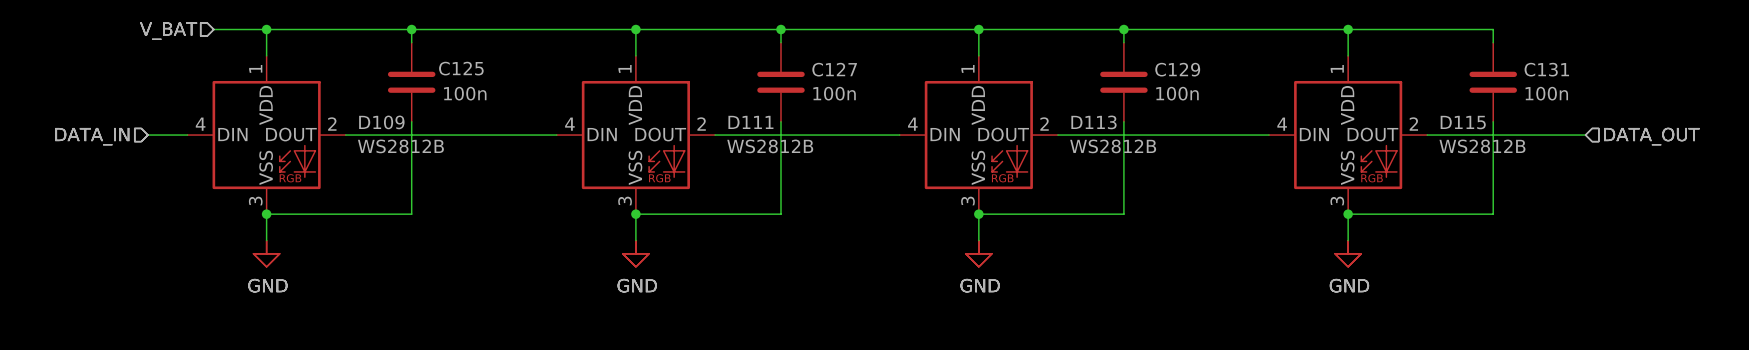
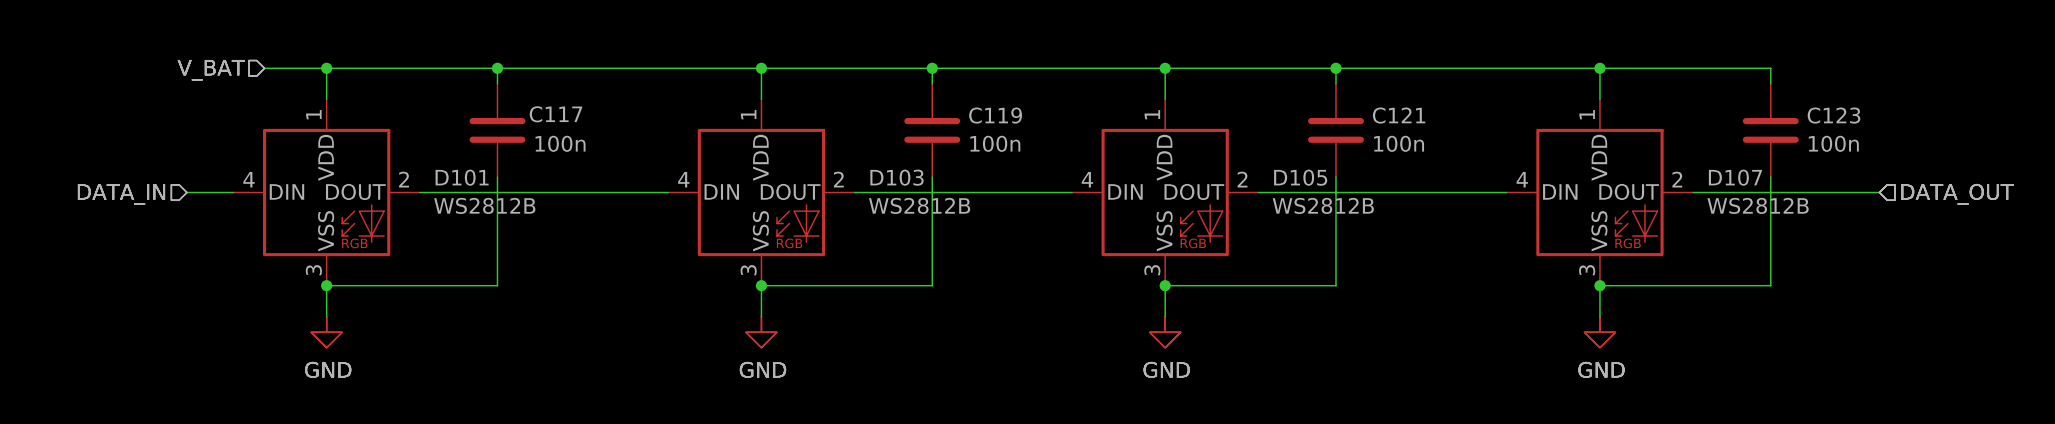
C125 name: C125 (461, 68) -> C117 (555, 114)
C127 name: C127 (834, 69) -> C119 (995, 115)
C129 name: C129 (1177, 69) -> C121 (1399, 115)
C131 name: C131 (1546, 69) -> C123 (1833, 115)
D109 name: D109 (381, 122) -> D101 (462, 177)
D111 name: D111 (750, 122) -> D103 (897, 177)
D113 name: D113 (1093, 122) -> D105 (1300, 177)
D115 name: D115 (1463, 122) -> D107 (1735, 177)

